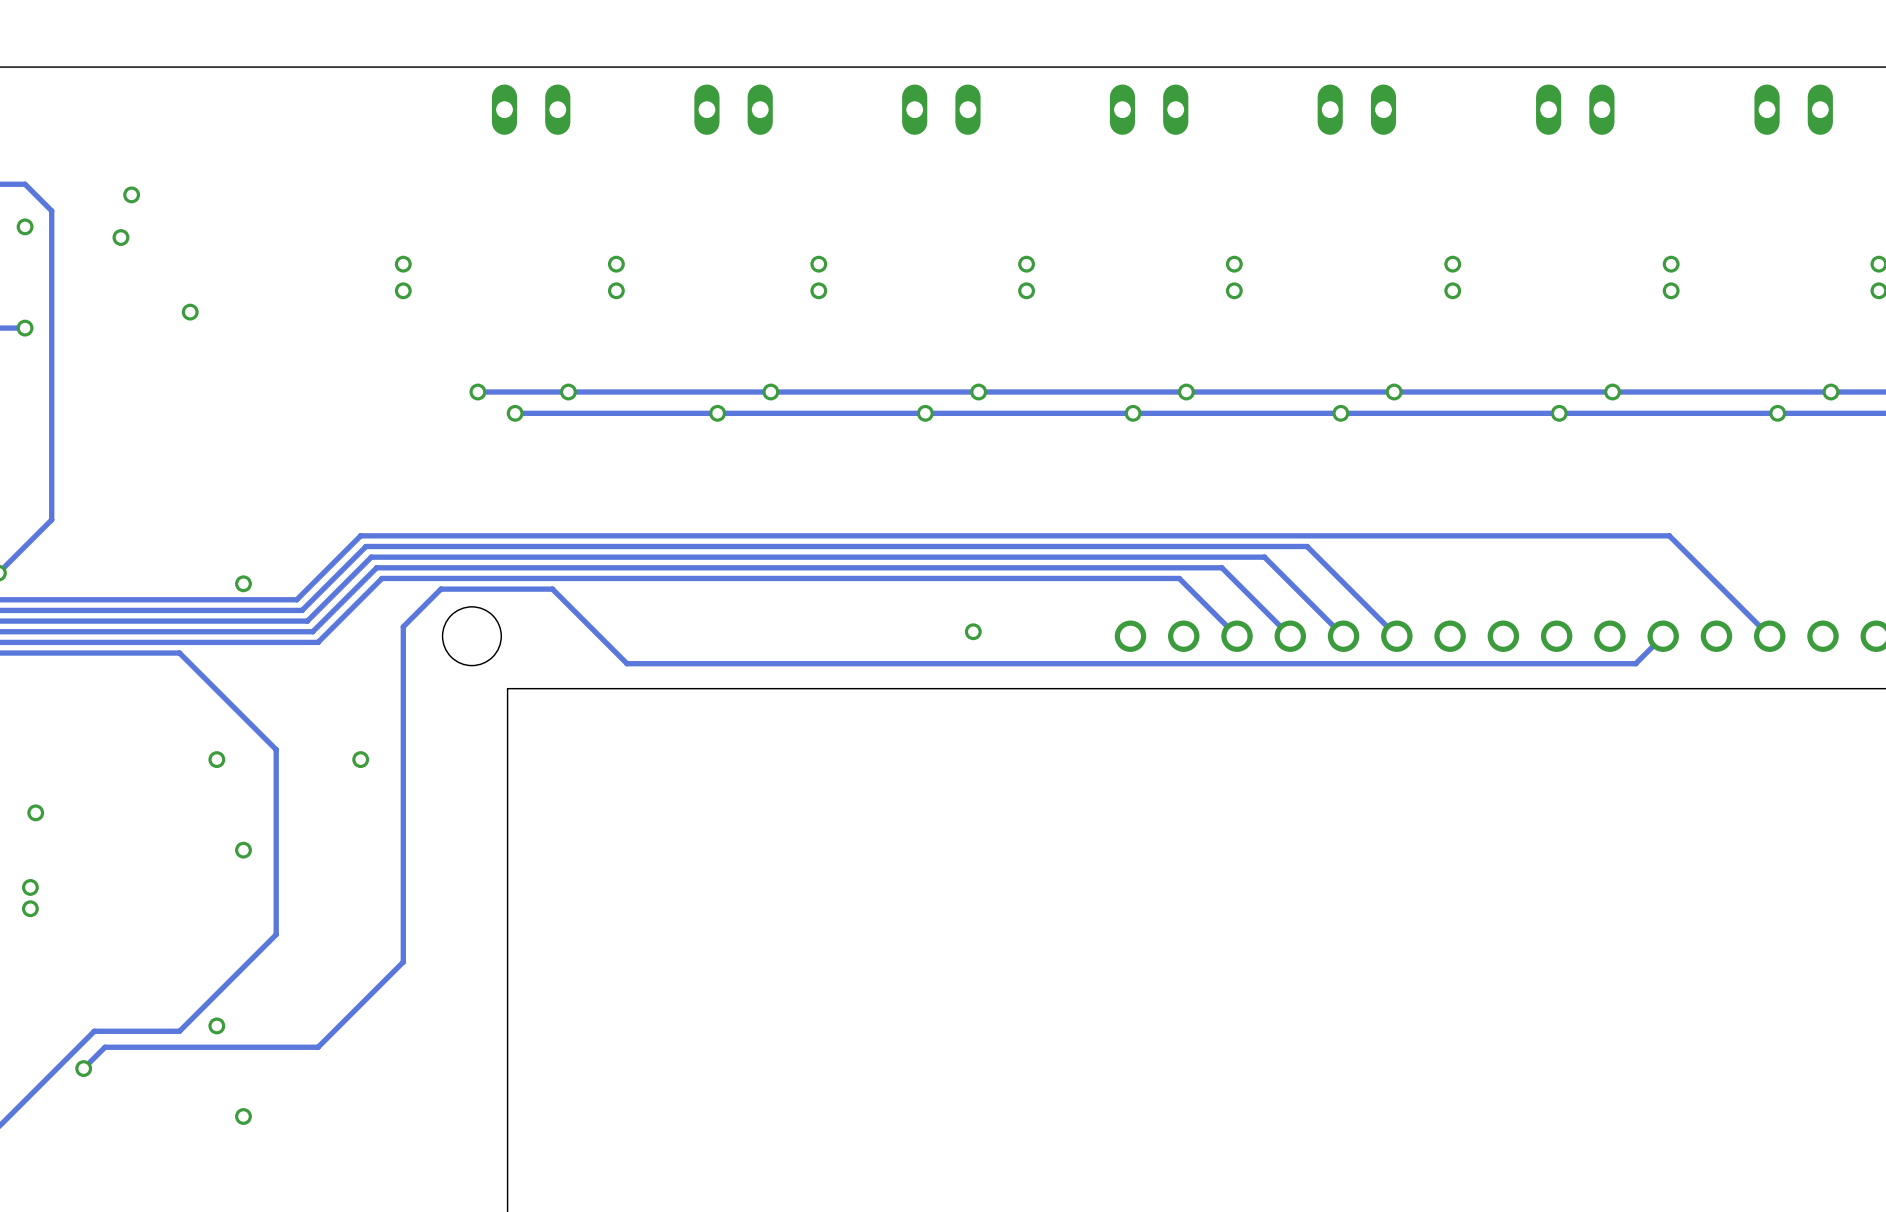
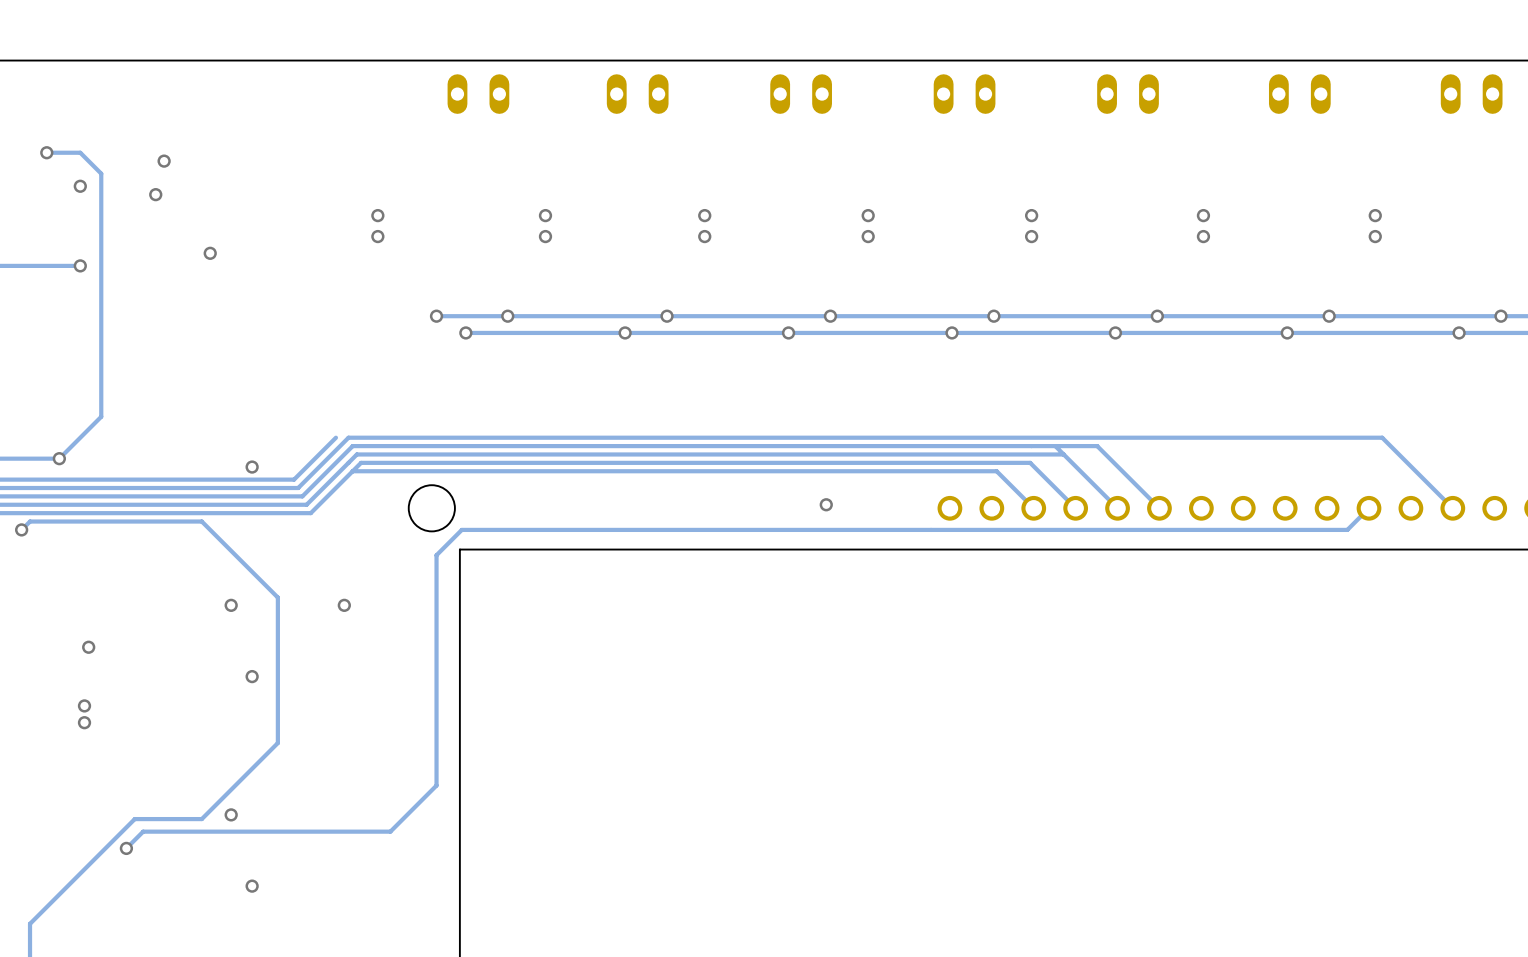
track: (1307, 546) (1317, 557) -> (1055, 446) (1097, 446)
track: (1680, 546) (1669, 535) (360, 535) (350, 546) -> (1382, 437) (1088, 437)
track: (1221, 567) (1232, 578) -> (1021, 454) (1063, 454)
track: (1179, 578) (1189, 589) -> (988, 462) (1030, 462)
track: (440, 589) (403, 626) (403, 962) (318, 1047) -> (553, 529) (461, 529) (436, 555) (436, 785) (390, 831) (310, 831)
track: none -> (407, 471) (352, 471)
track: (552, 589) (627, 663) -> (495, 471) (996, 471)

